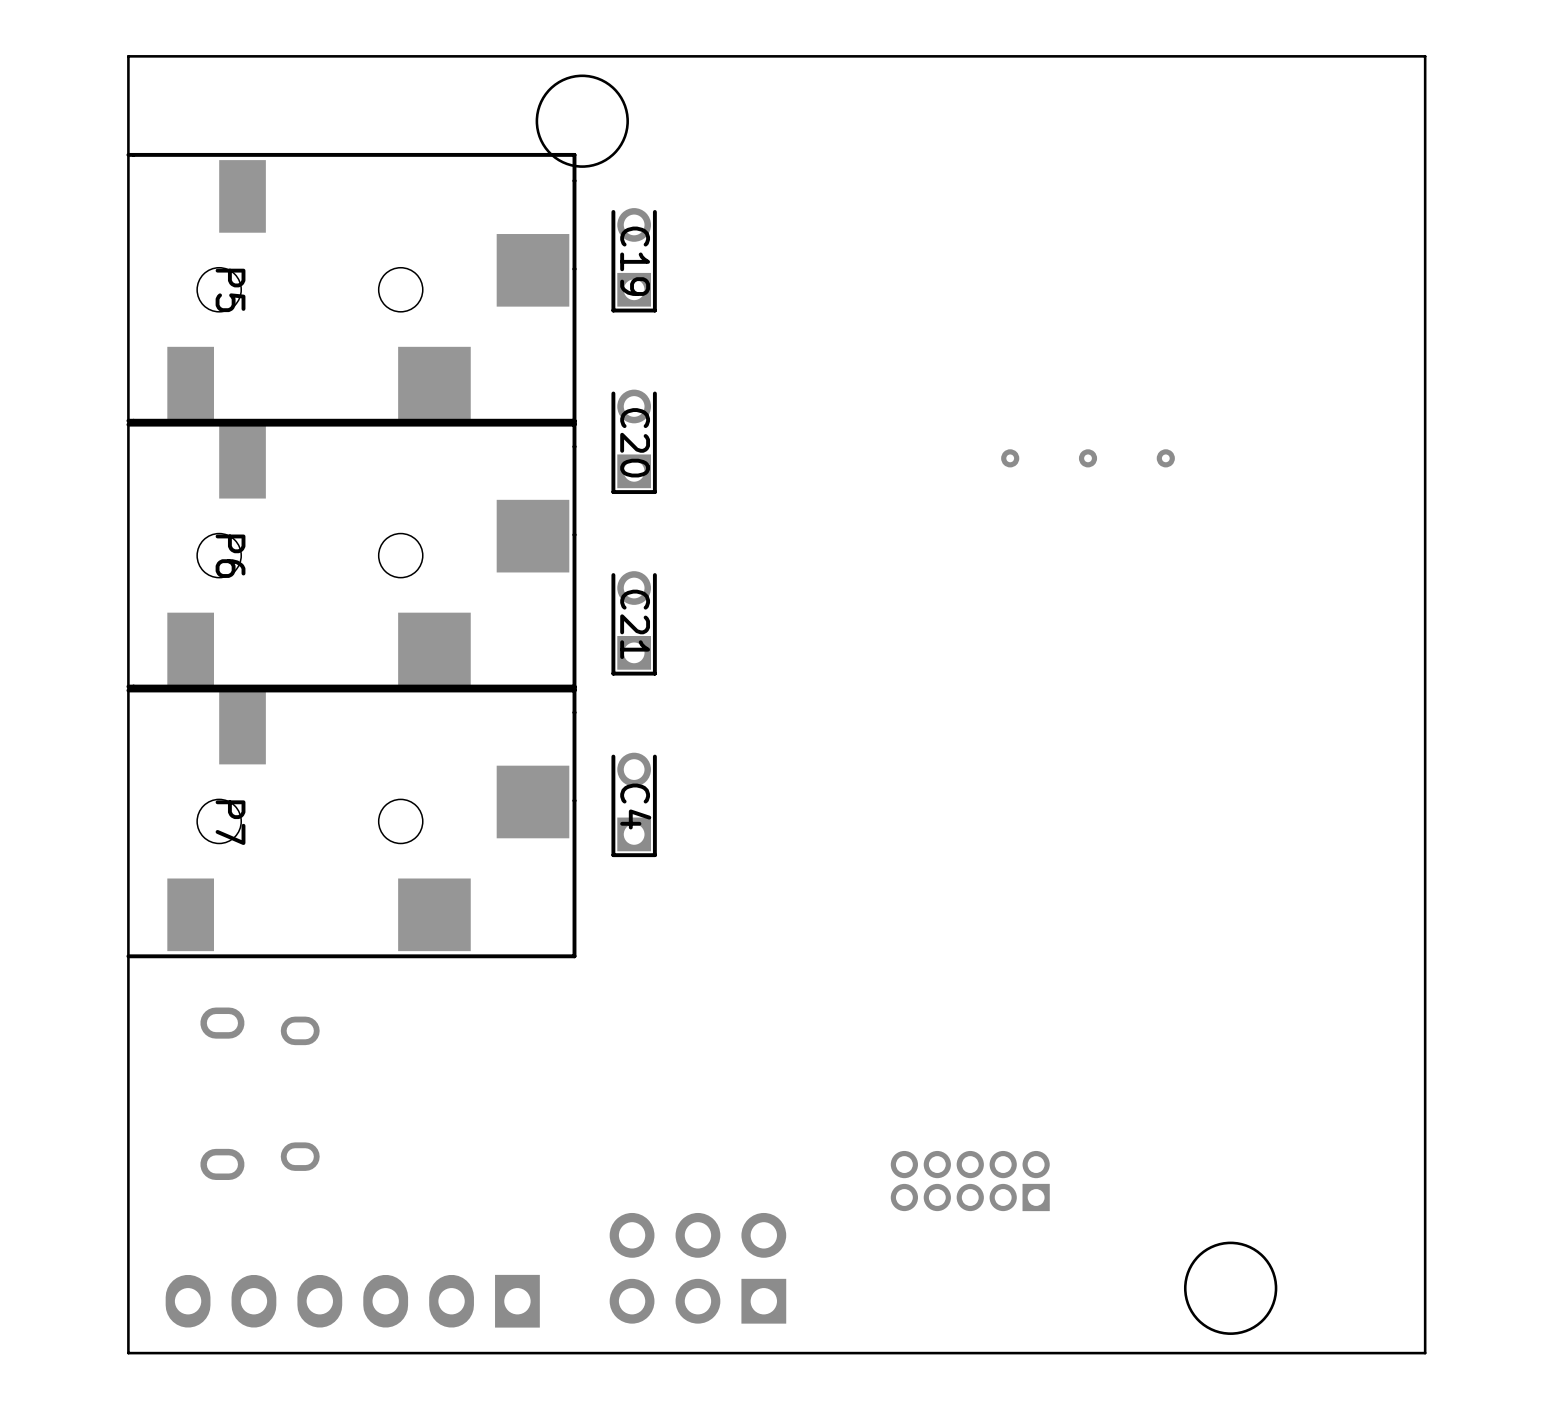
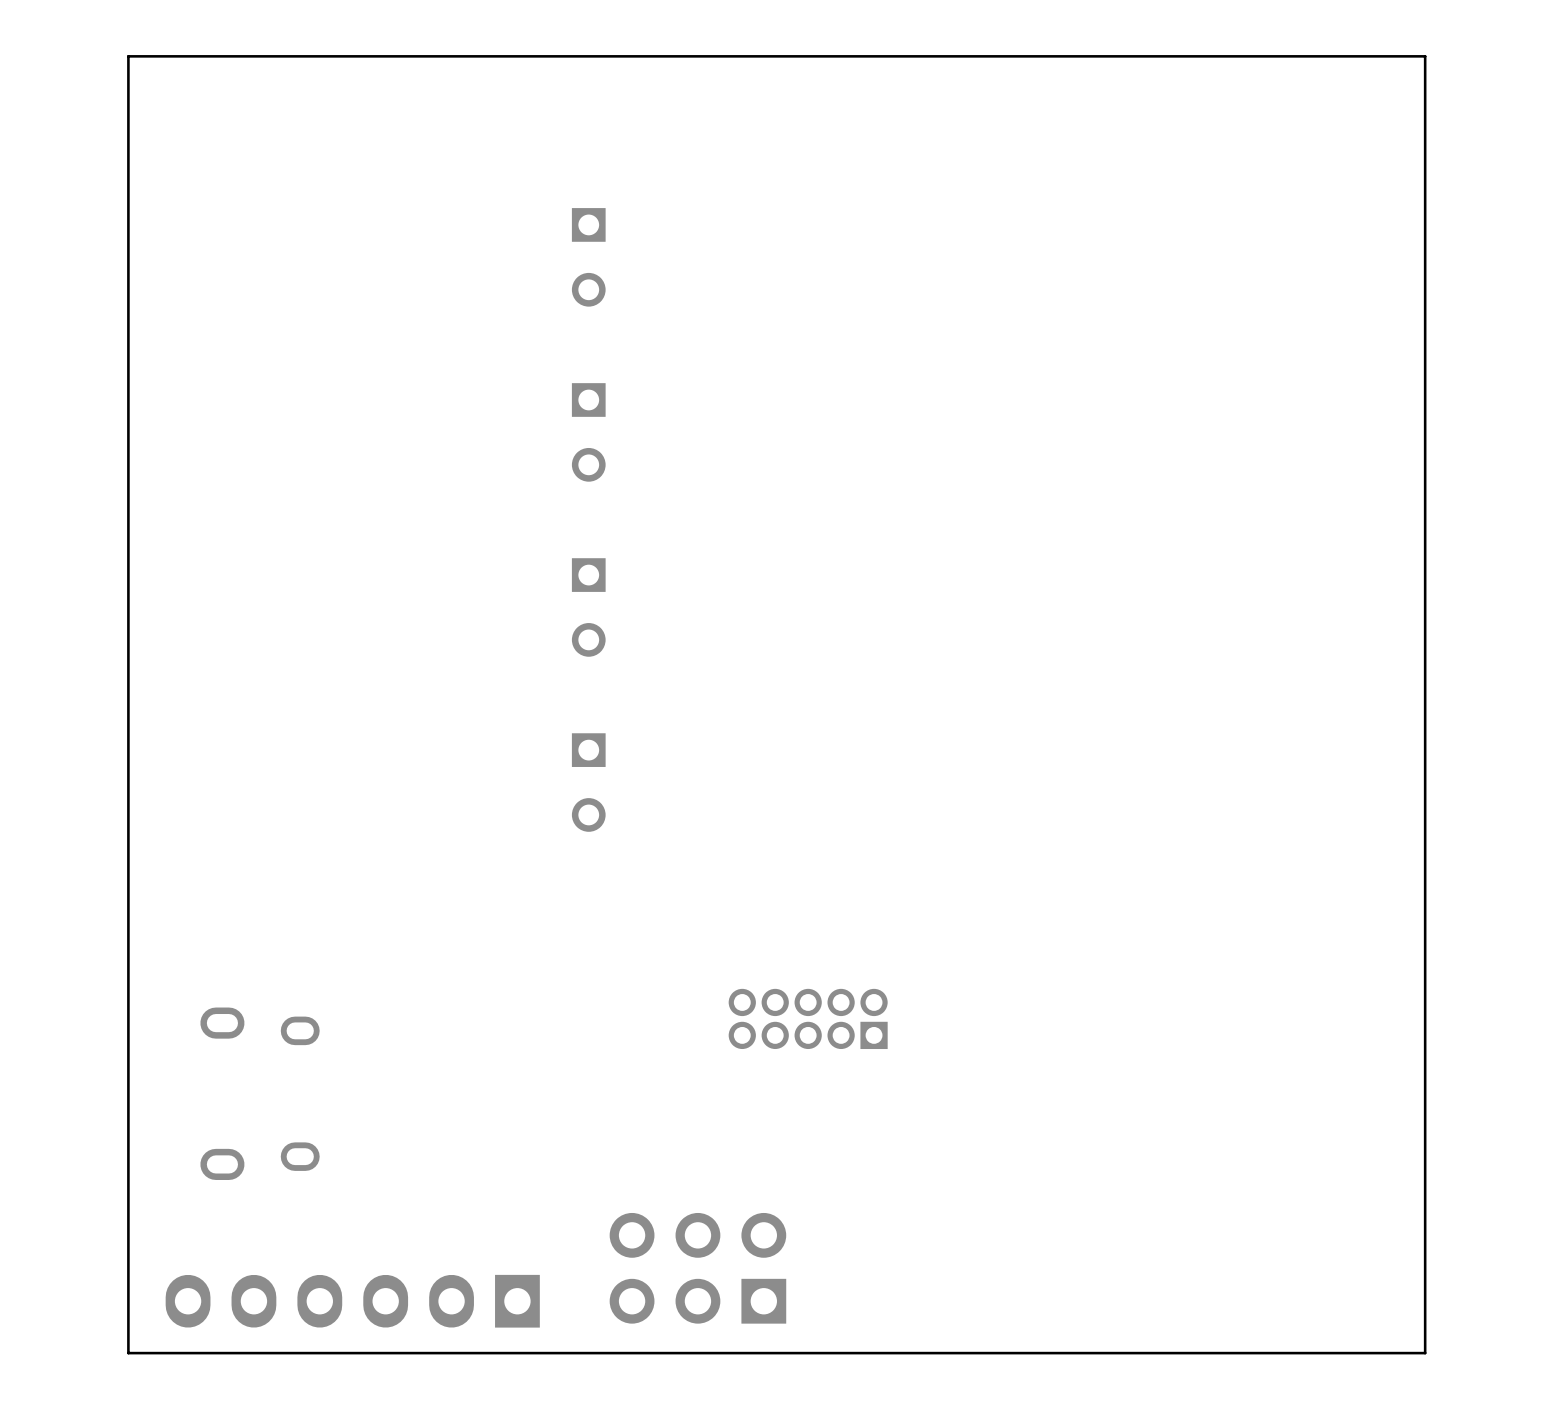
round board edge: [535, 74, 629, 168] -> none
C19 side: bottom (634, 260) -> top (588, 257)
P5: (351, 289) -> none
C20 side: bottom (634, 441) -> top (588, 432)
via: (1010, 458) -> none
via: (1088, 458) -> none
via: (1165, 458) -> none
P6: (351, 555) -> none
C21 side: bottom (634, 623) -> top (588, 607)
C4 side: bottom (634, 804) -> top (588, 782)
P7: (351, 821) -> none
part position: (970, 1181) -> (808, 1018)
round board edge: [1183, 1241, 1278, 1335] -> none

